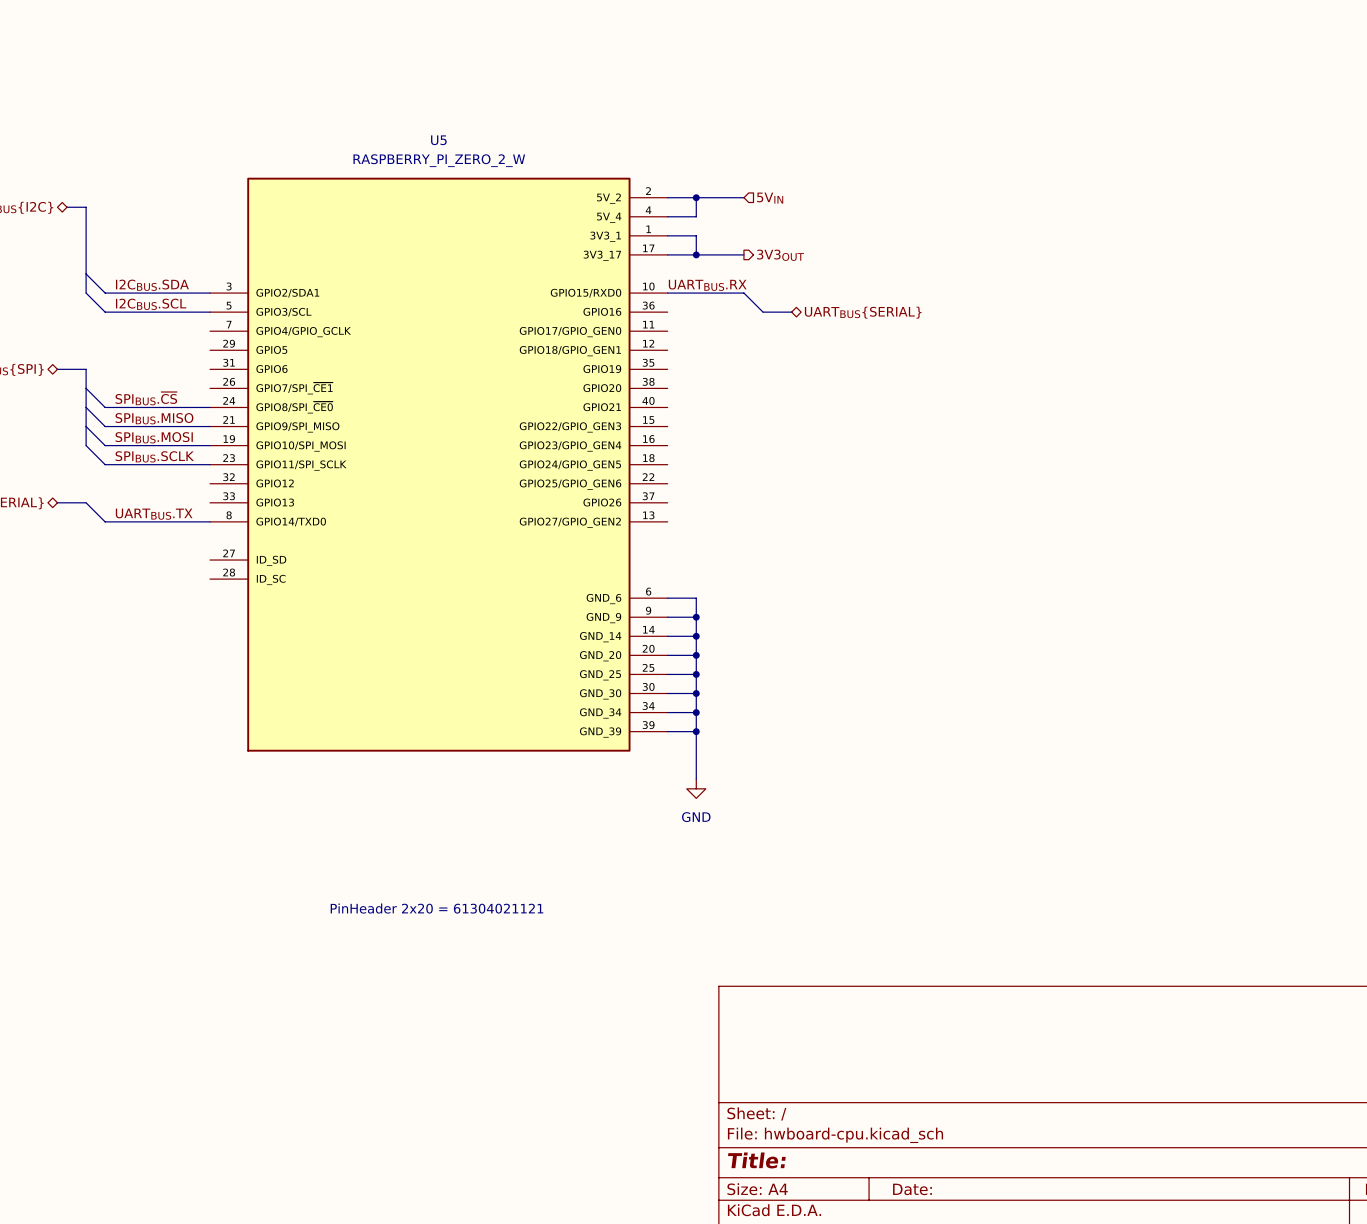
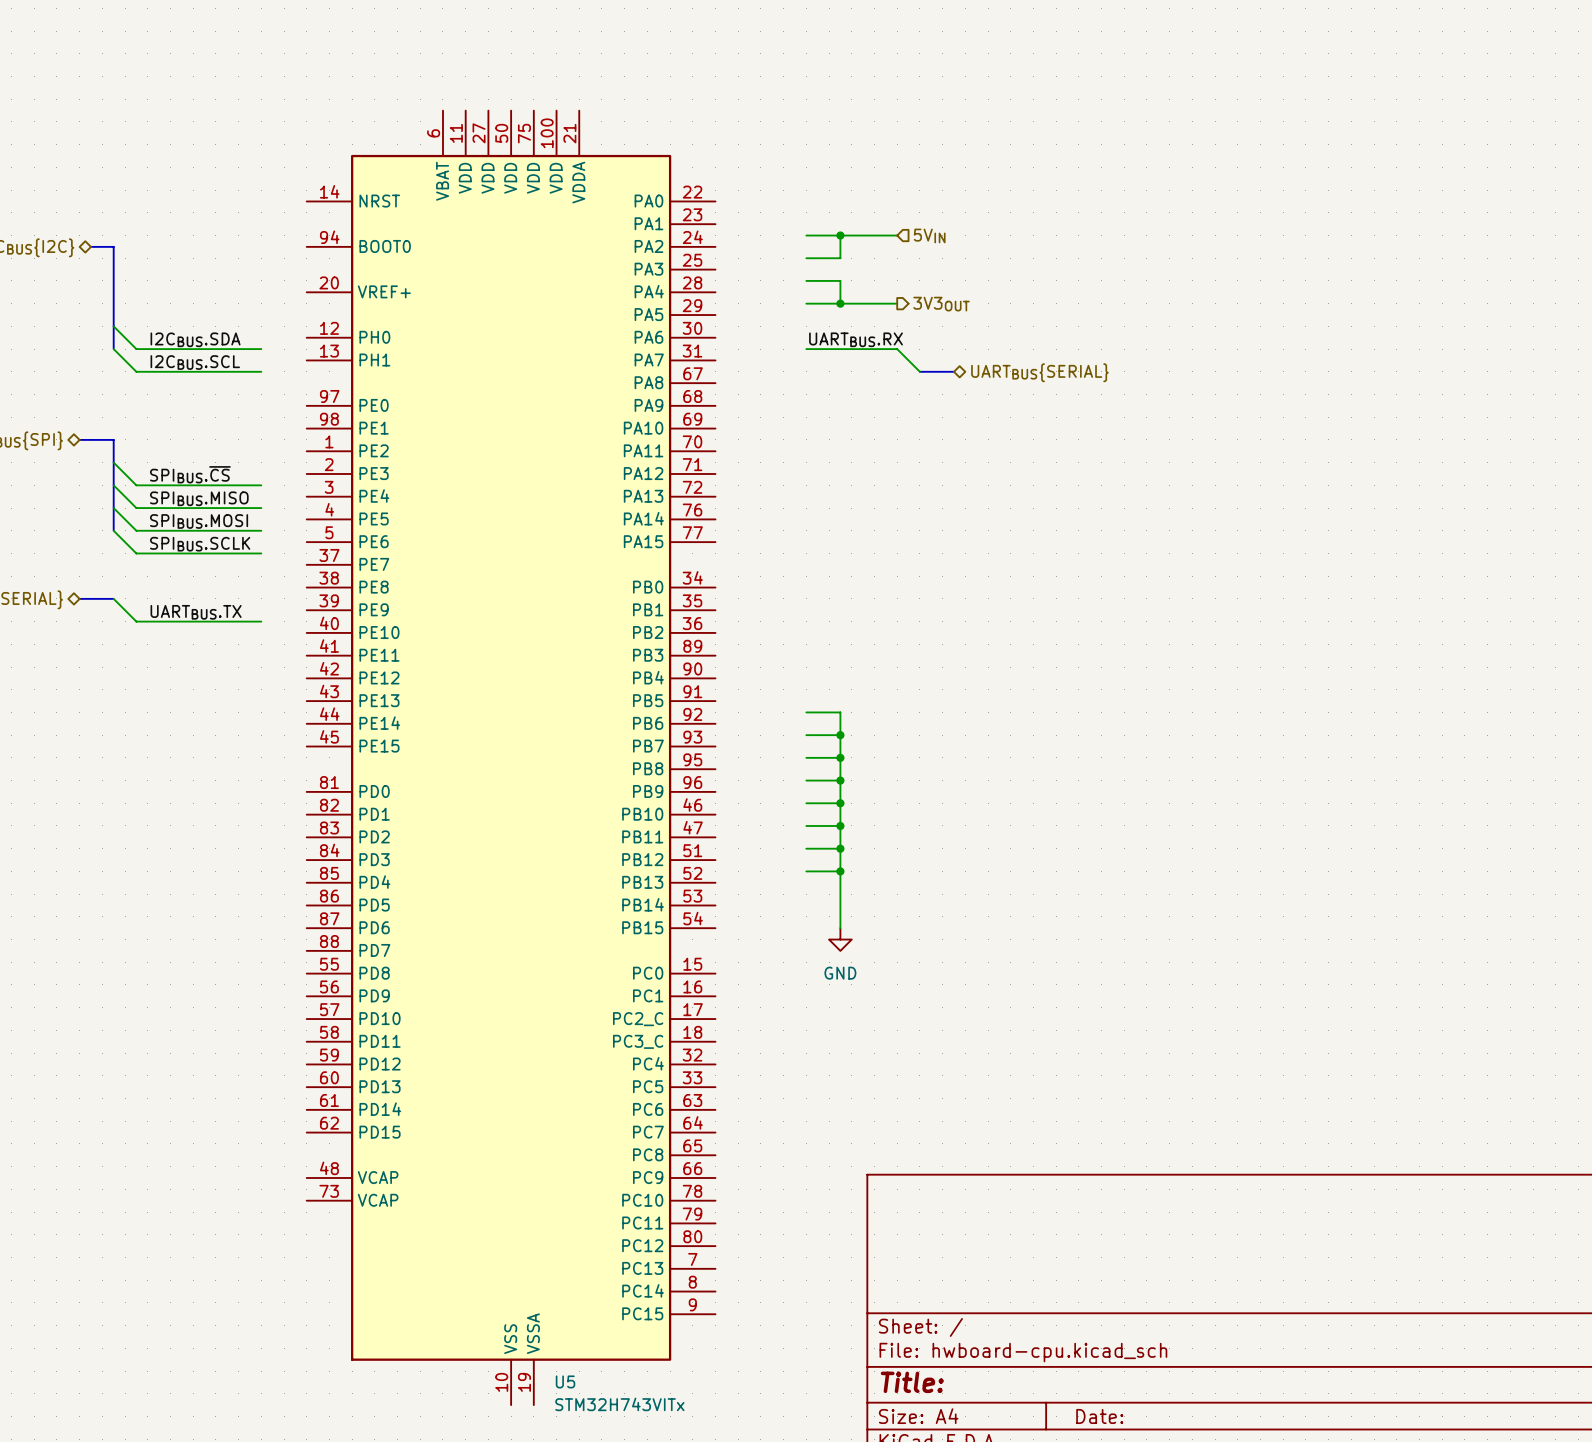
U5 name position: U5 (438, 140) -> U5 (565, 1381)
U5 value: RASPBERRY_PI_ZERO_2_W (439, 160) -> STM32H743VITx (619, 1404)
U5 symbol: [210, 177, 668, 752] -> [306, 110, 716, 1406]
text: PinHeader 2x20 = 61304021121 (437, 908) -> none

